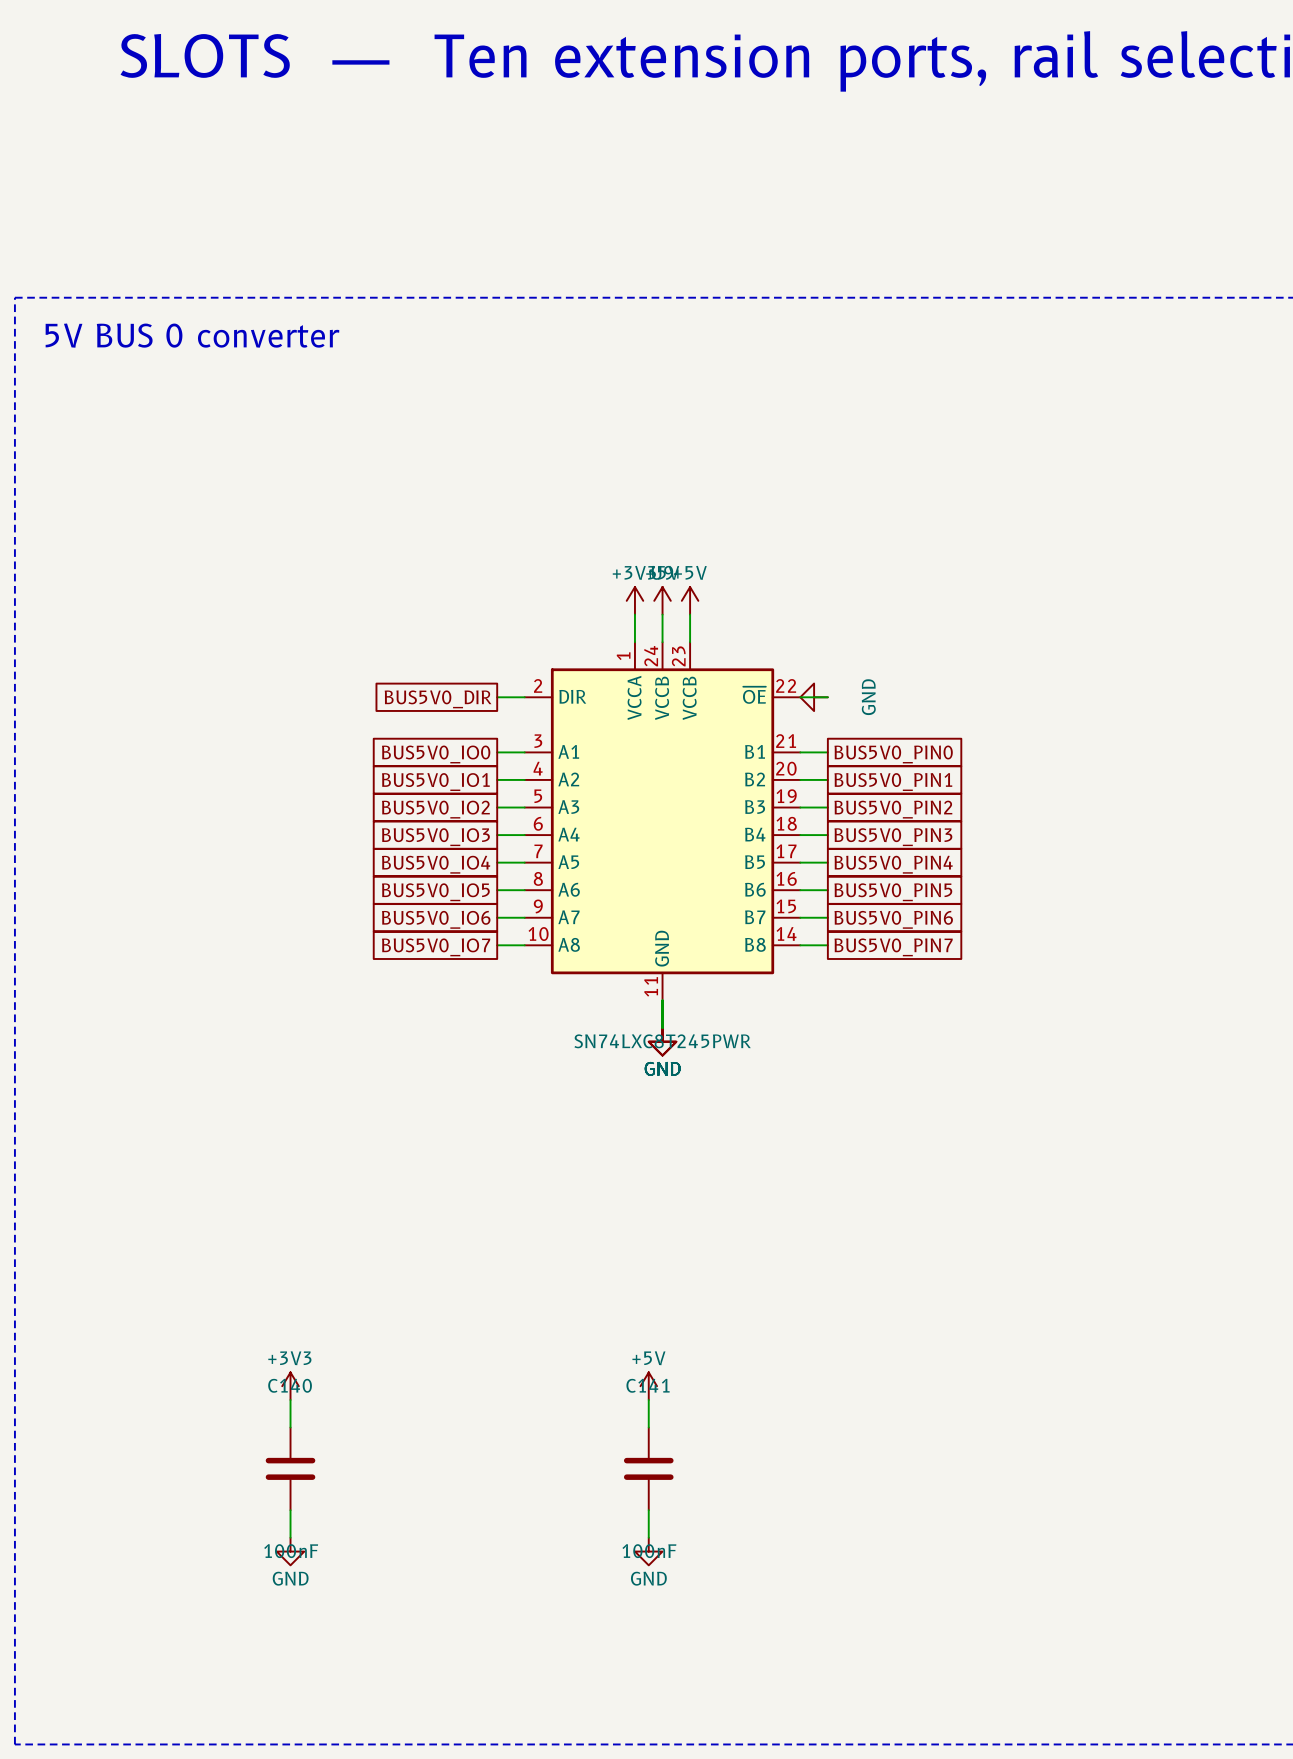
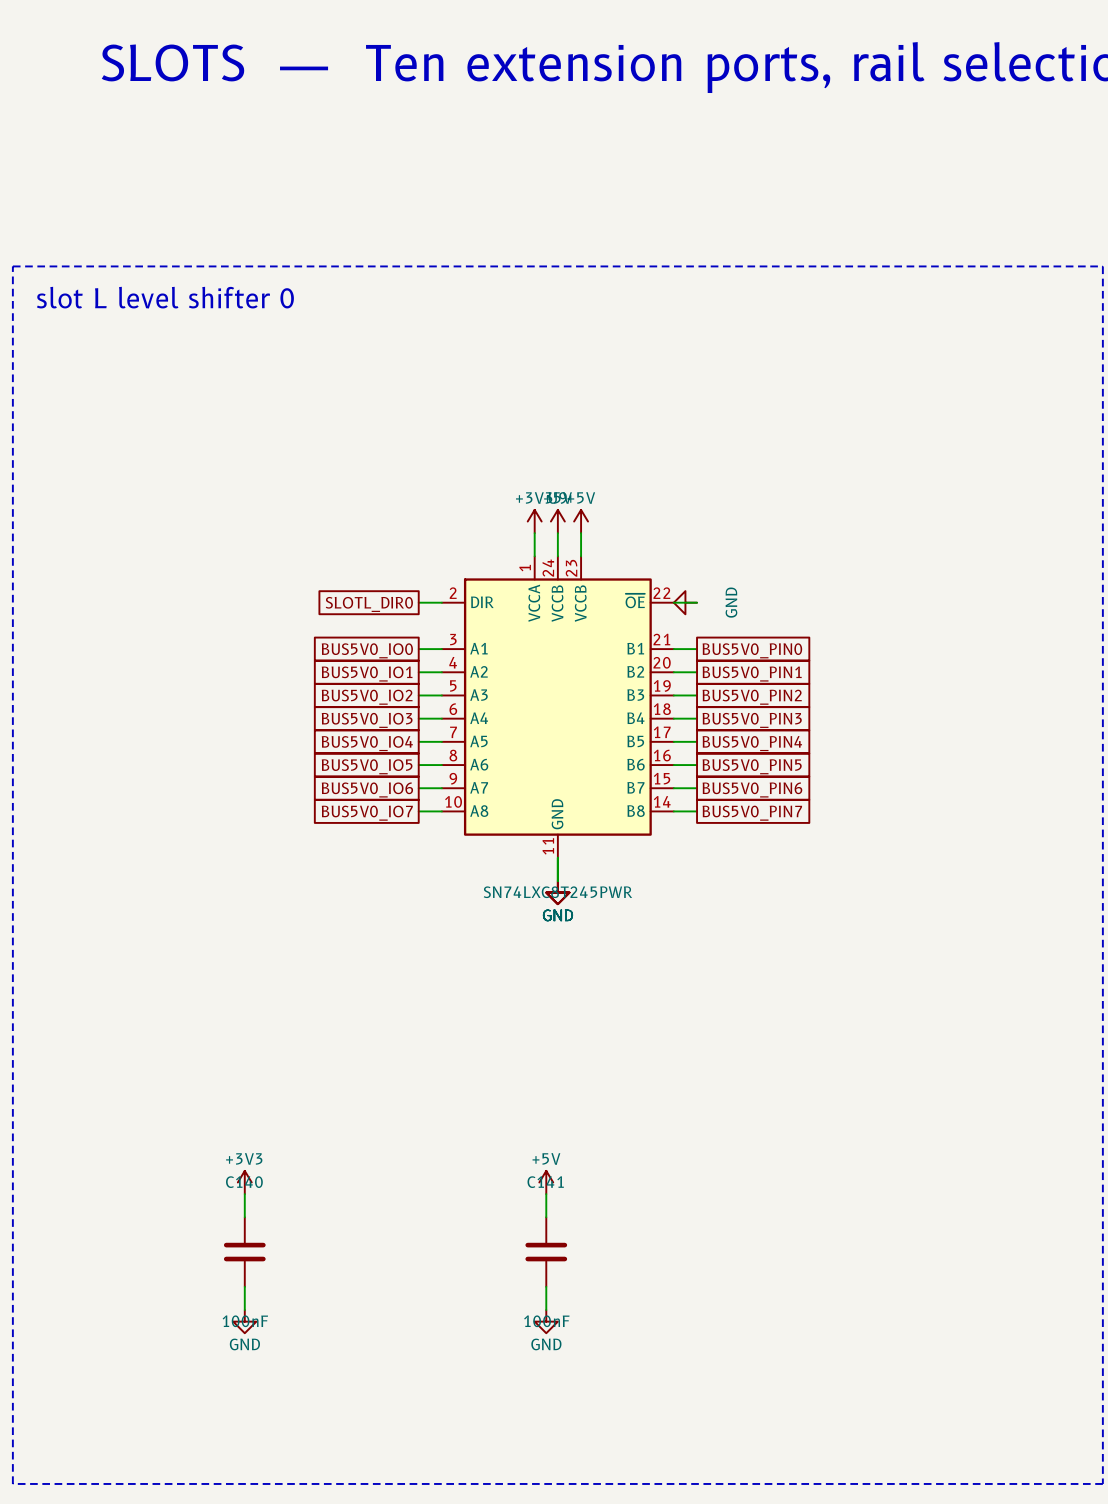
text: 5V BUS 0 converter (192, 335) -> slot L level shifter 0 (165, 297)
global label: BUS5V0_DIR (438, 699) -> SLOTL_DIR0 (369, 604)

